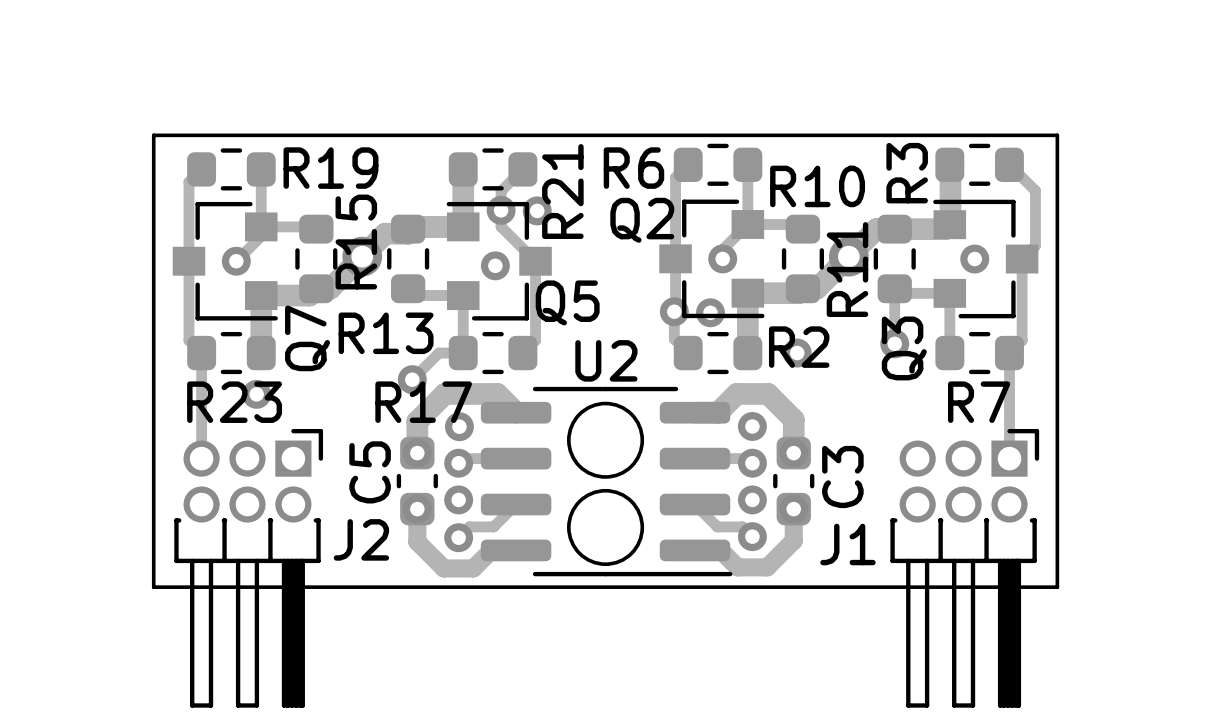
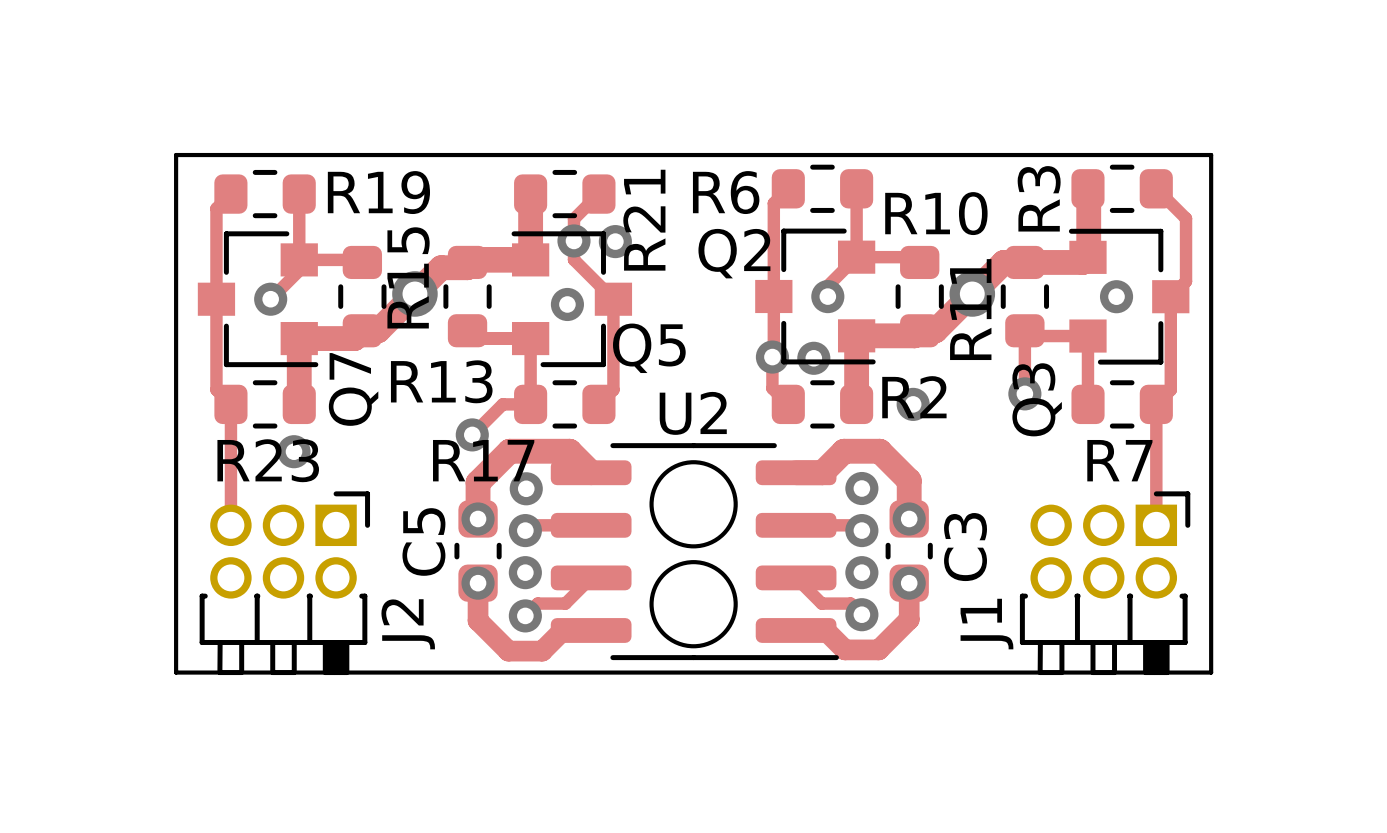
J2 footprint: [174, 428, 324, 708] -> [199, 491, 371, 676]
J1 footprint: [890, 428, 1040, 708] -> [1019, 491, 1191, 676]

